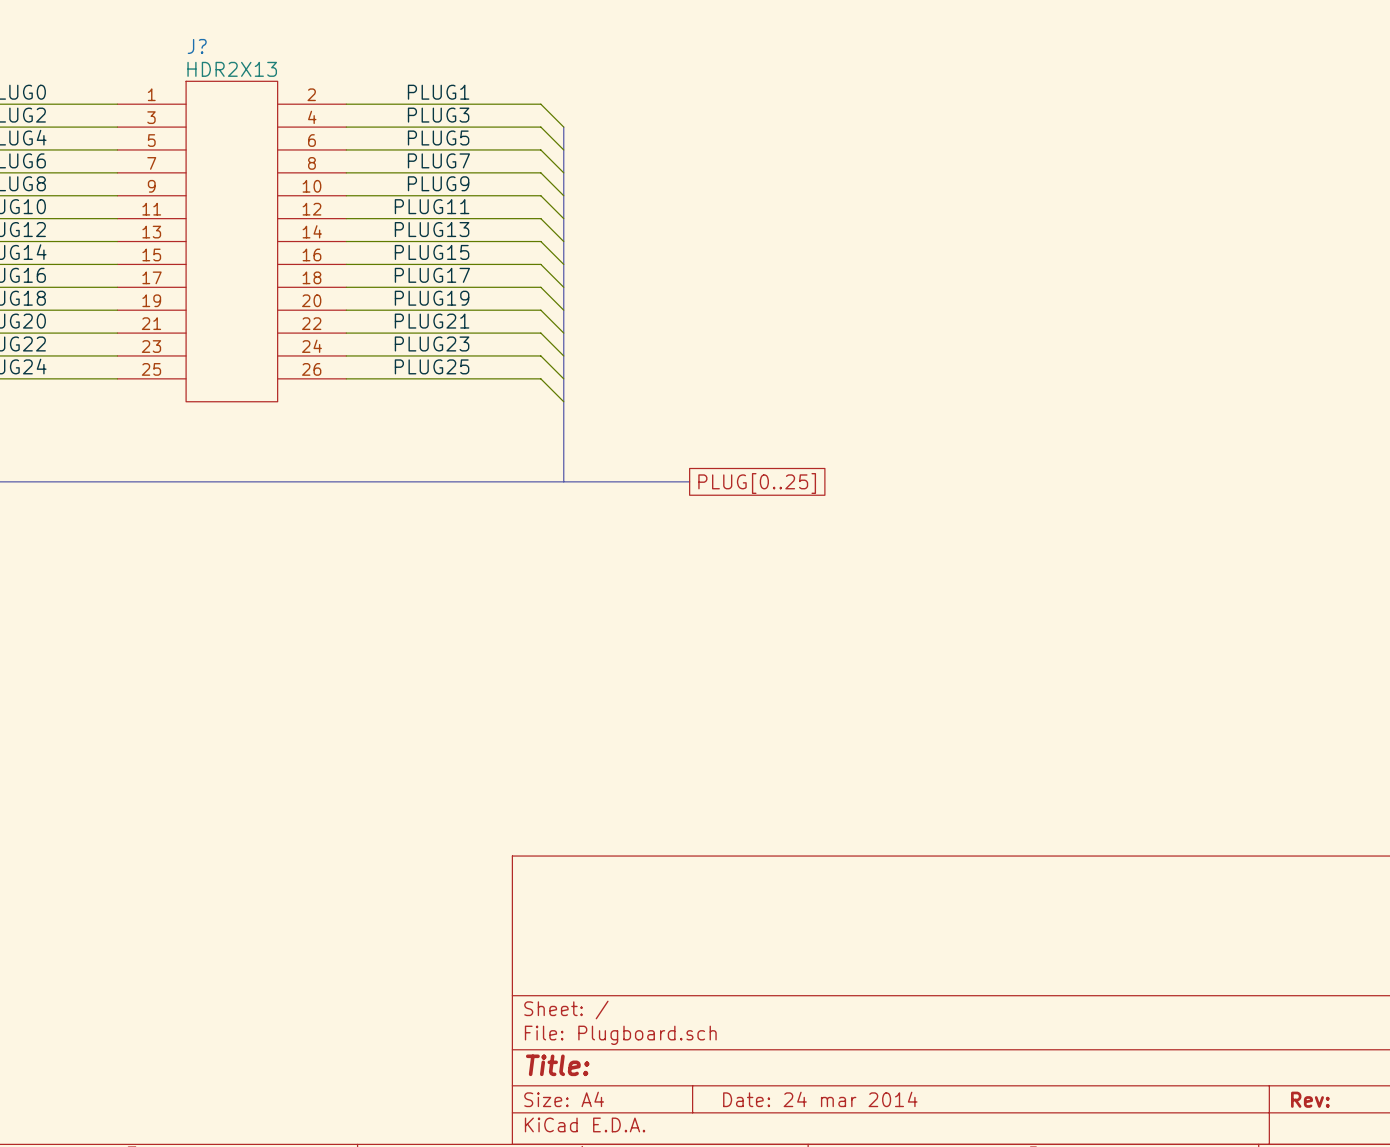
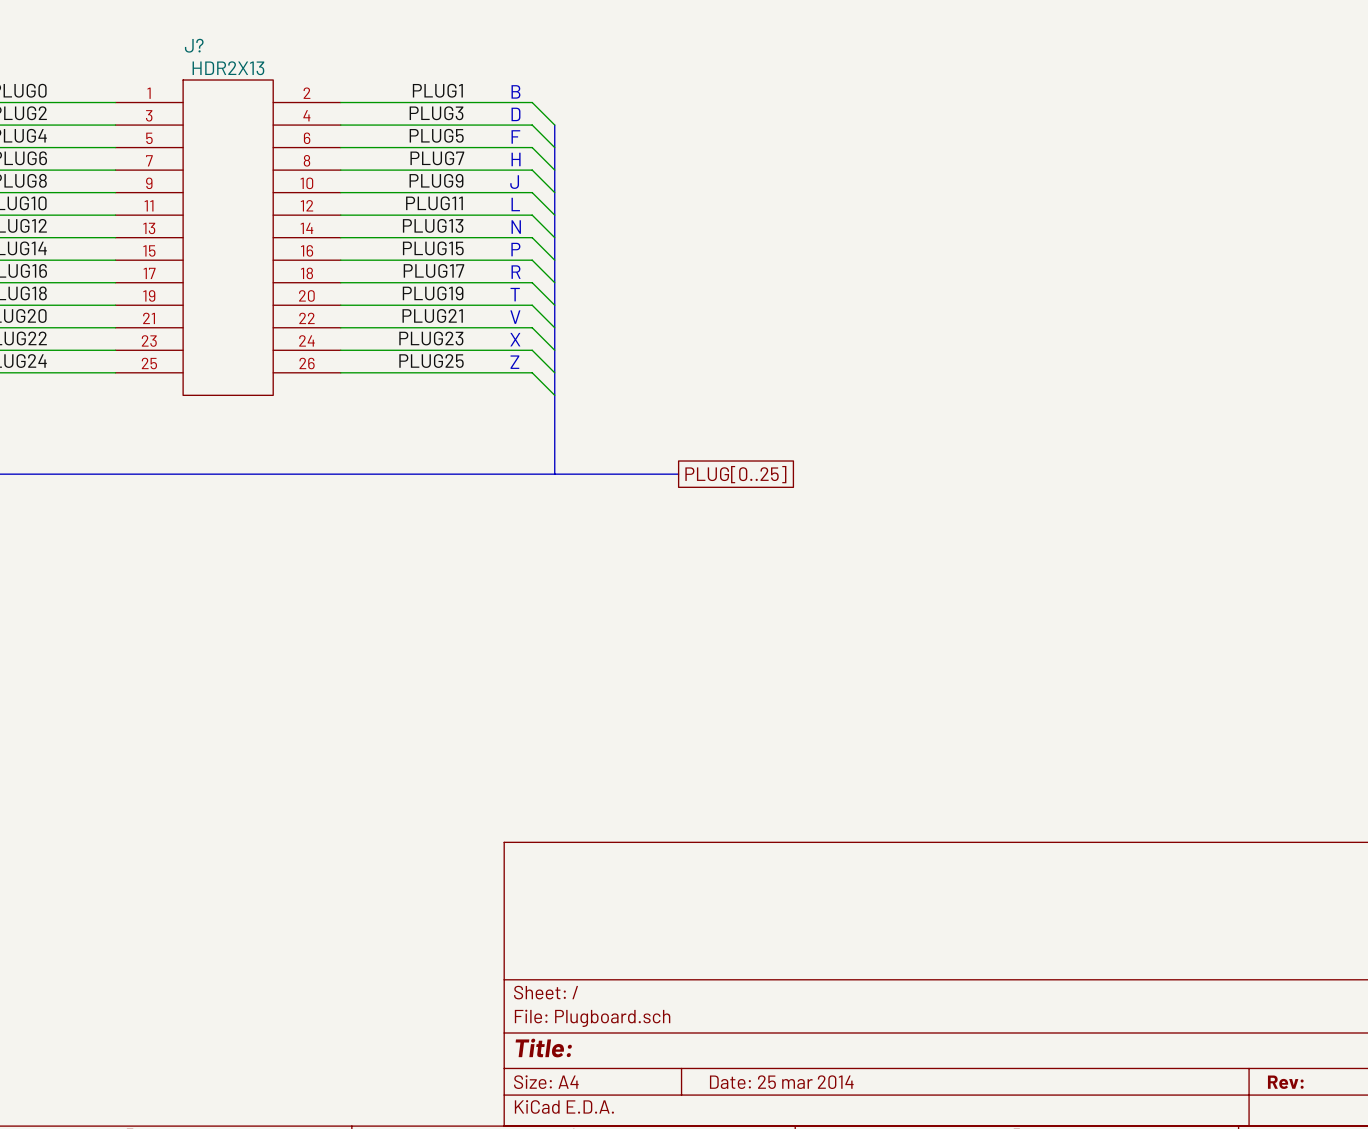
text: none -> B (515, 91)
text: none -> D (515, 114)
text: none -> F (515, 136)
text: none -> H (516, 159)
text: none -> J (514, 182)
text: none -> L (515, 204)
text: none -> N (516, 227)
text: none -> P (515, 249)
text: none -> R (516, 272)
text: none -> T (515, 294)
text: none -> V (515, 317)
text: none -> X (515, 339)
text: none -> Z (514, 362)
title block: Date: 24 mar 2014 (820, 1099) -> Date: 25 mar 2014 (781, 1082)

